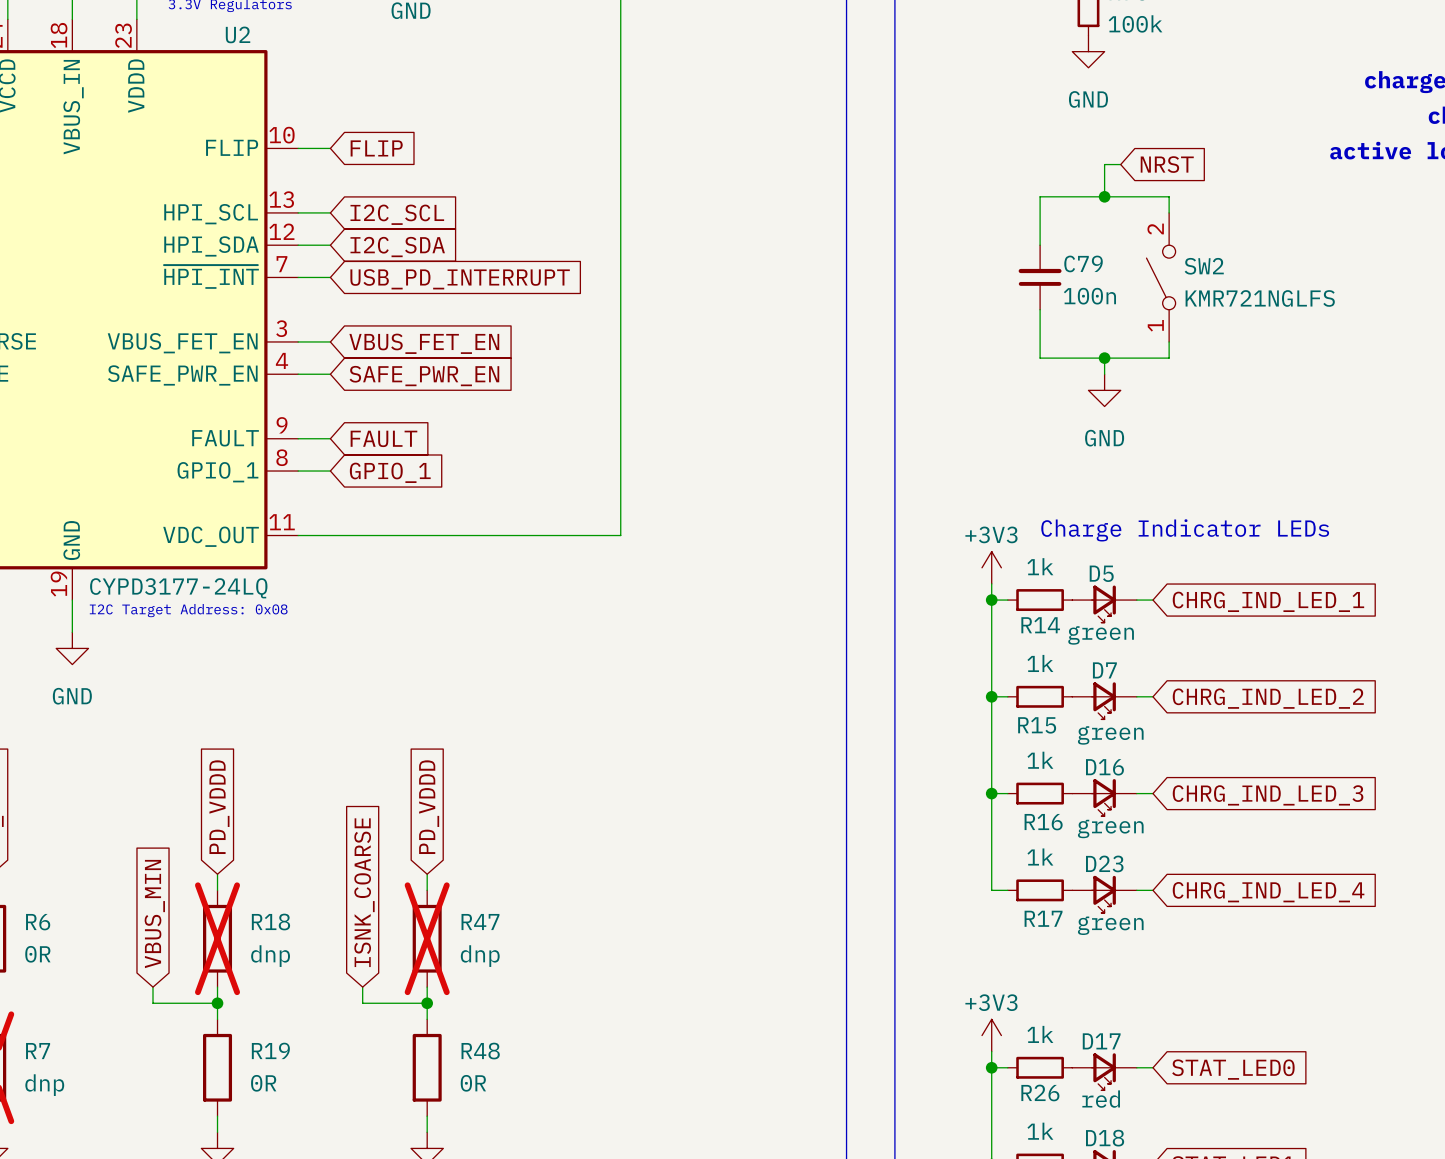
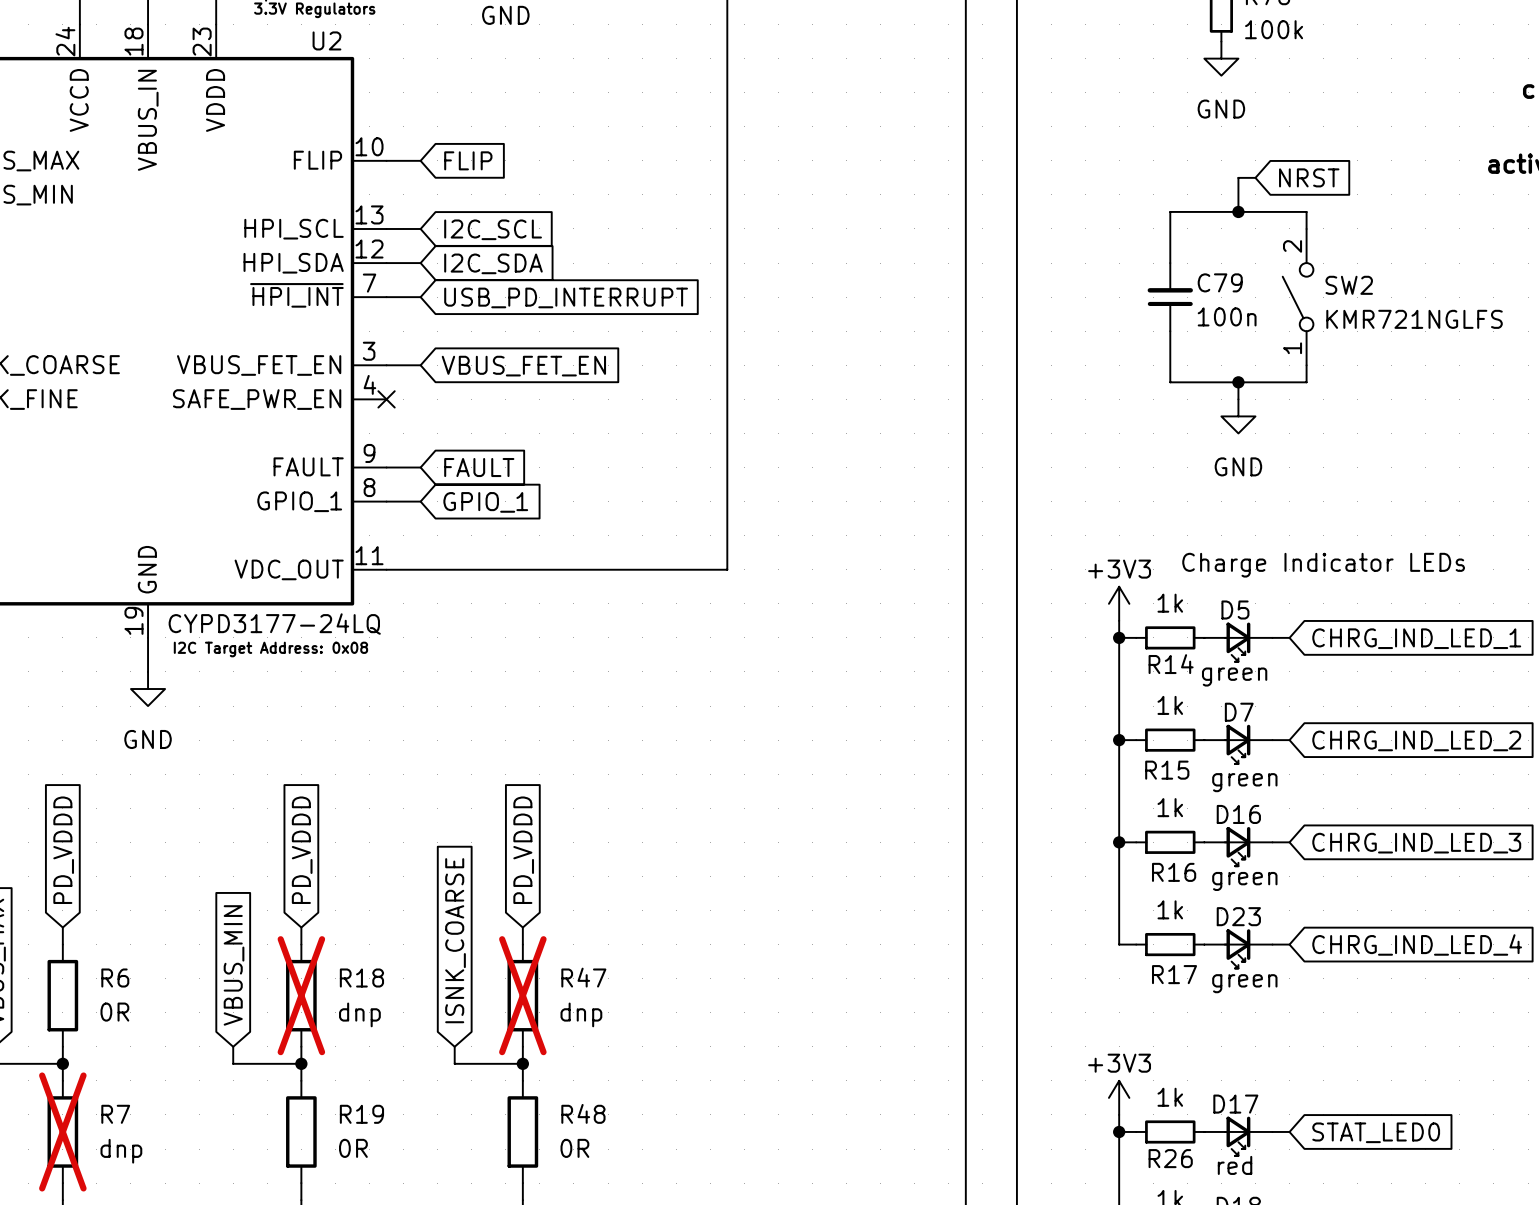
wire: (298, 374) (330, 374) -> none
no-connect mark: none -> (386, 399)
global label: SAFE_PWR_EN (424, 376) -> none

